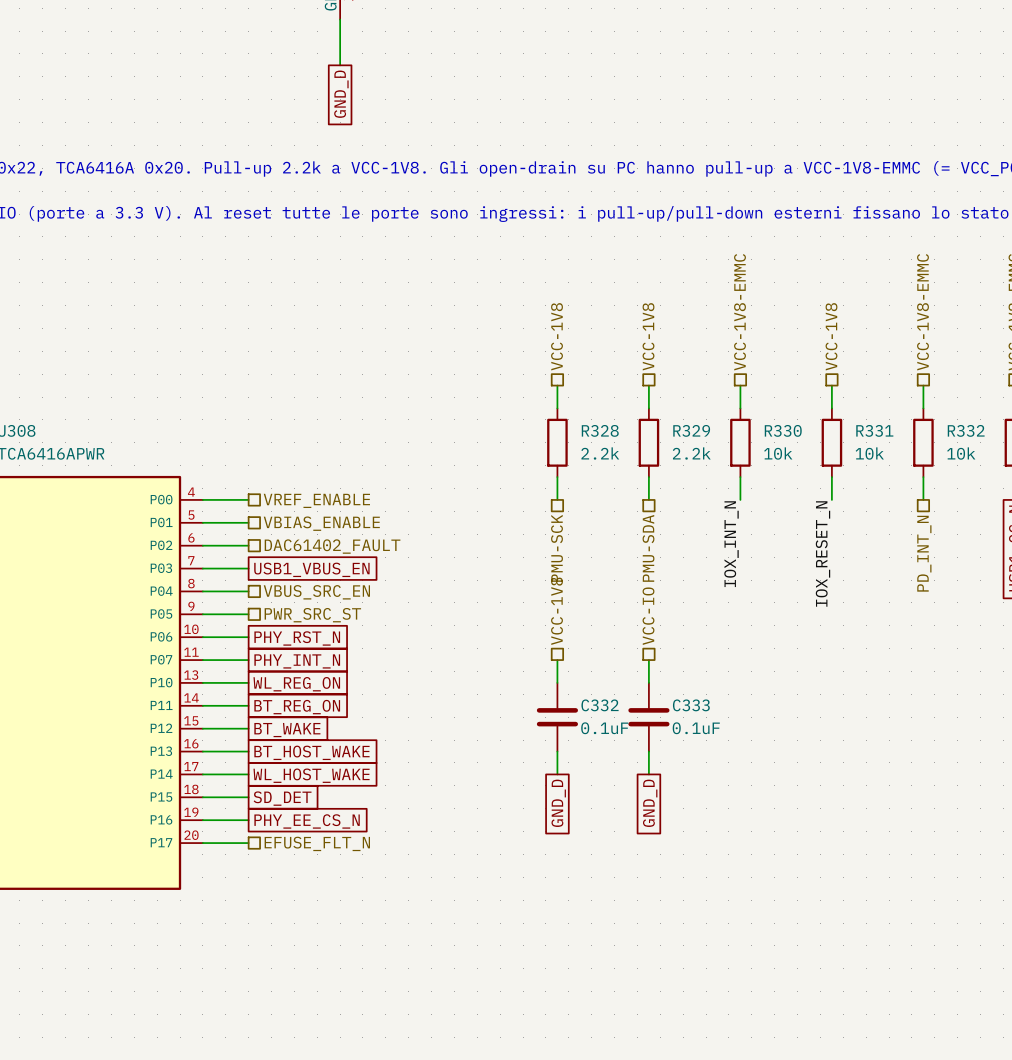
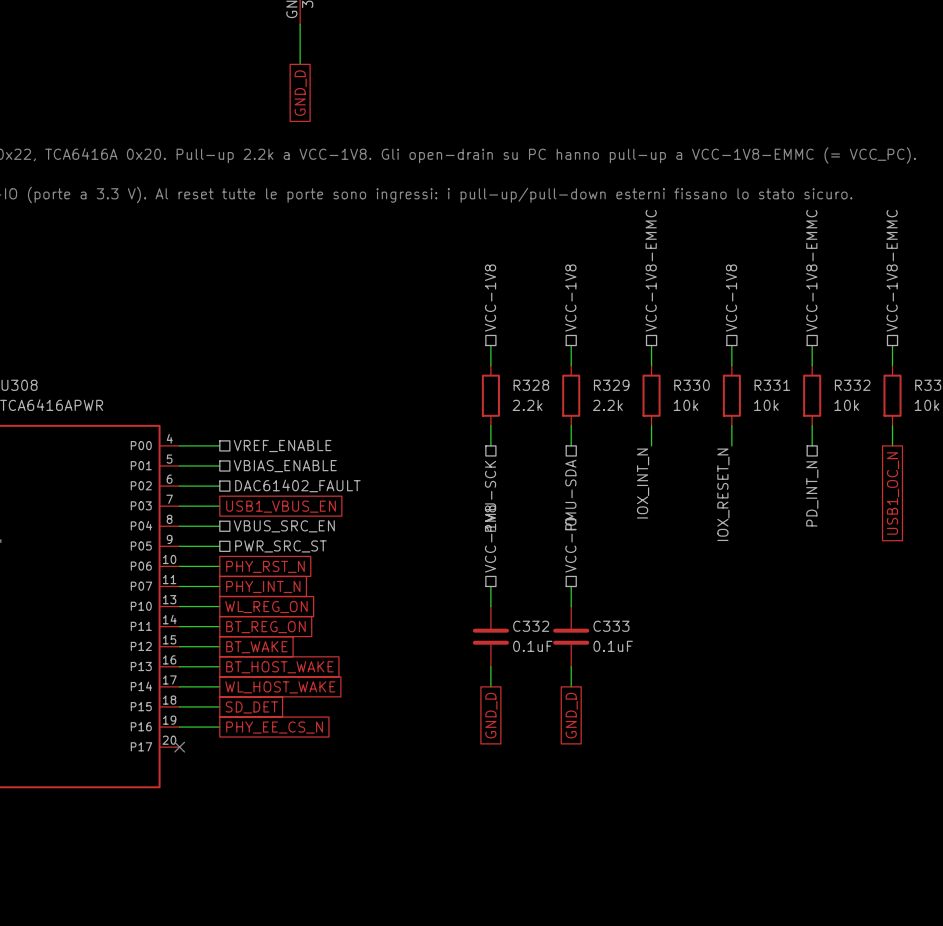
wire: (202, 843) (248, 843) -> none
no-connect mark: none -> (179, 747)
hierarchical label: EFUSE_FLT_N (317, 843) -> none

